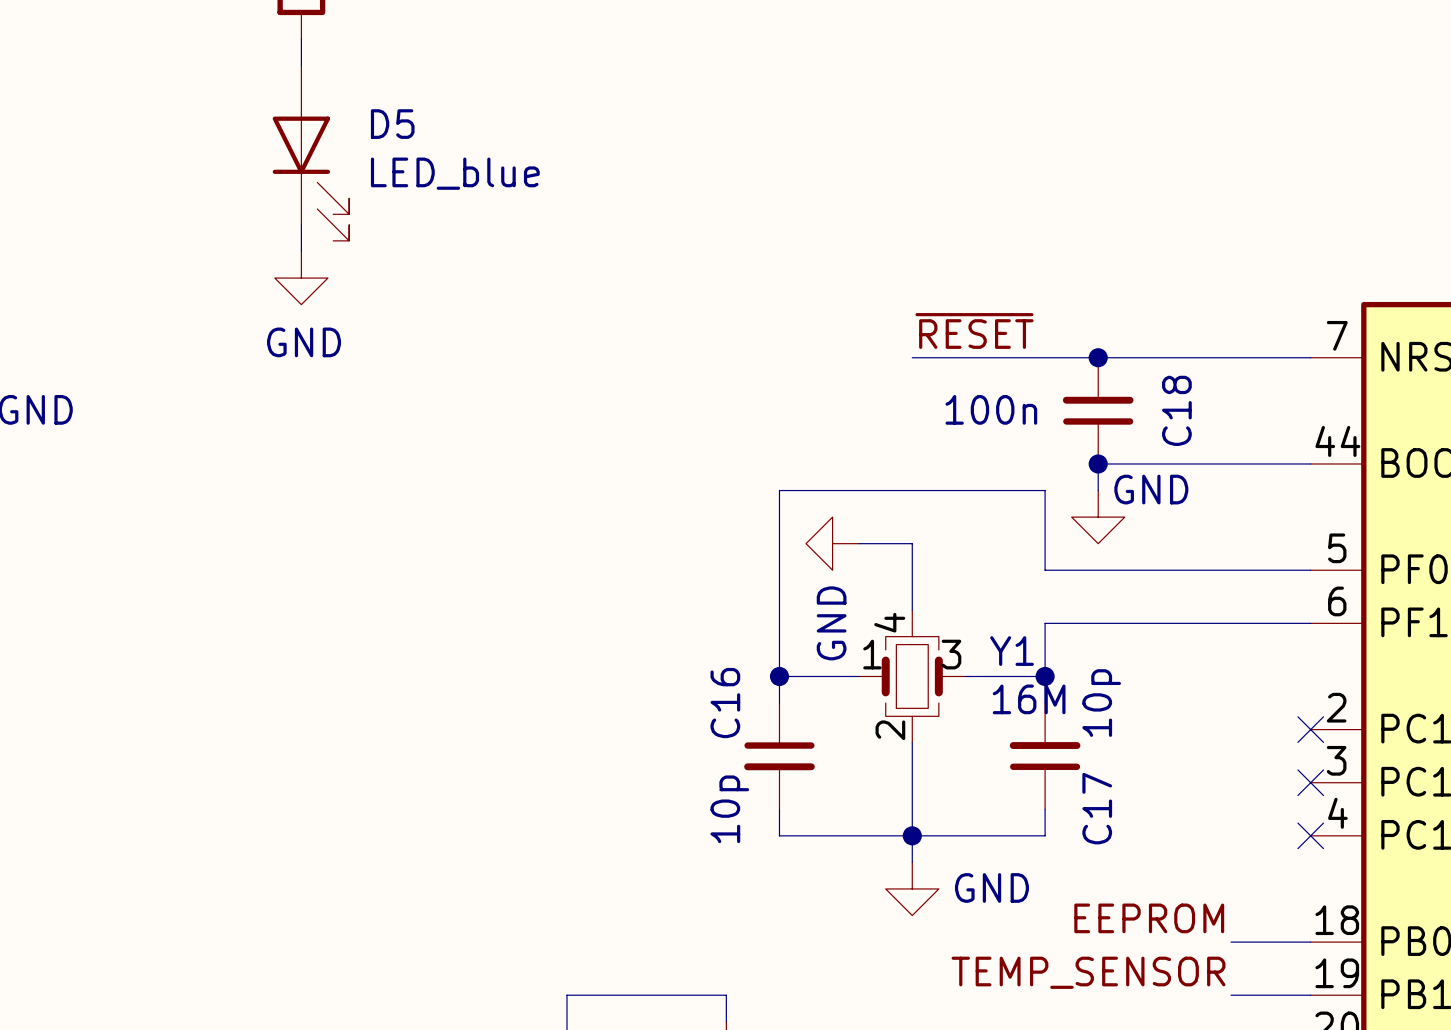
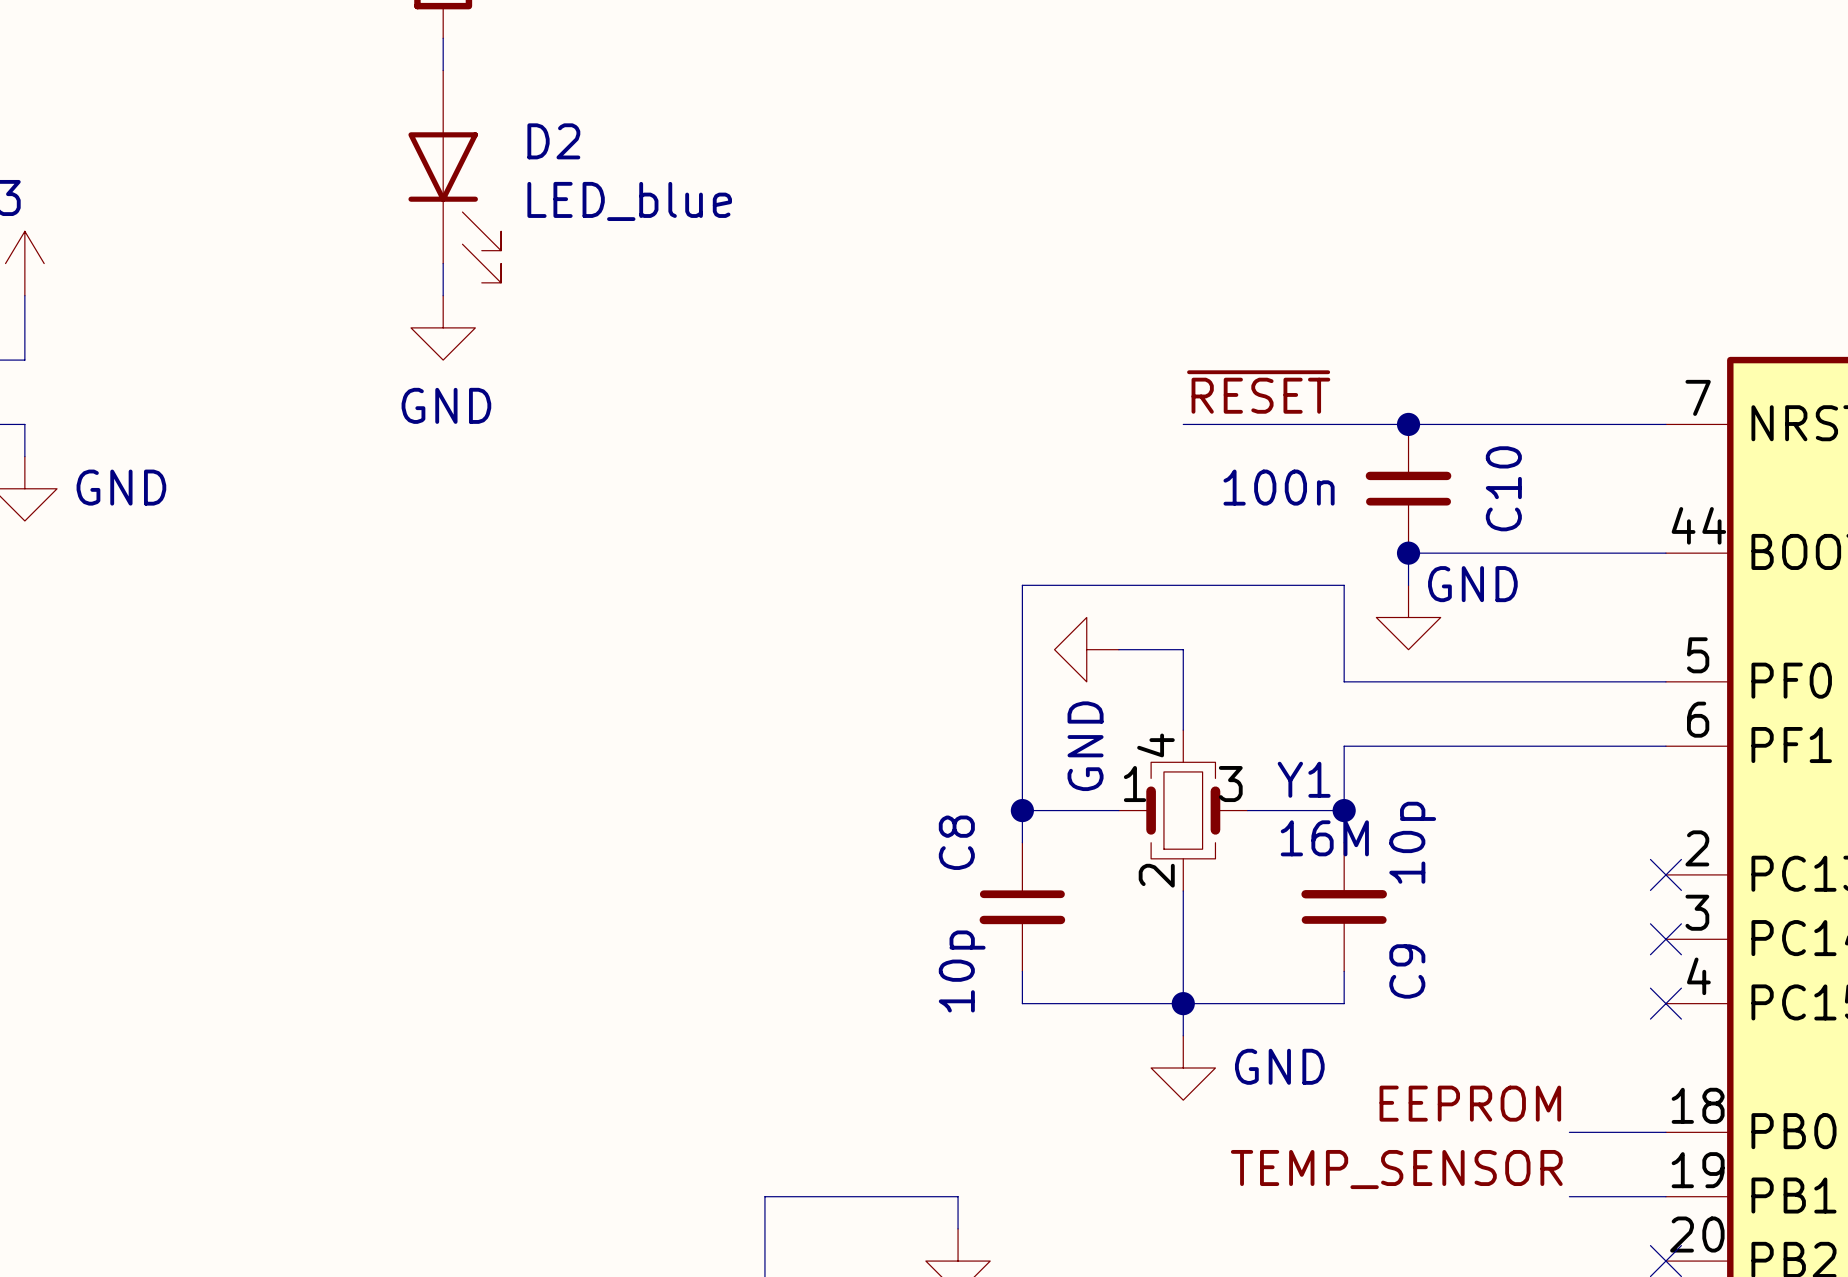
D5 name: D5 (392, 124) -> D2 (553, 141)
C18 name: C18 (1176, 410) -> C10 (1503, 488)
C16 name: C16 (725, 703) -> C8 (956, 842)
C17 name: C17 (1097, 808) -> C9 (1407, 971)

